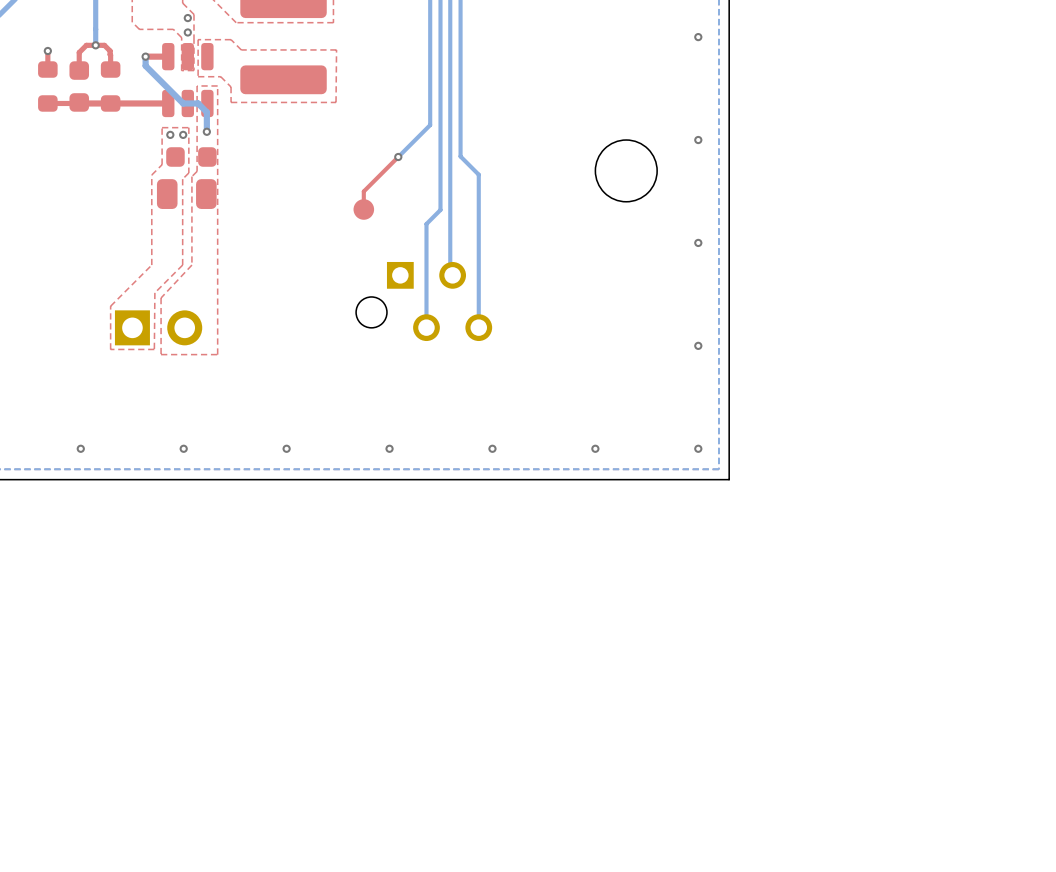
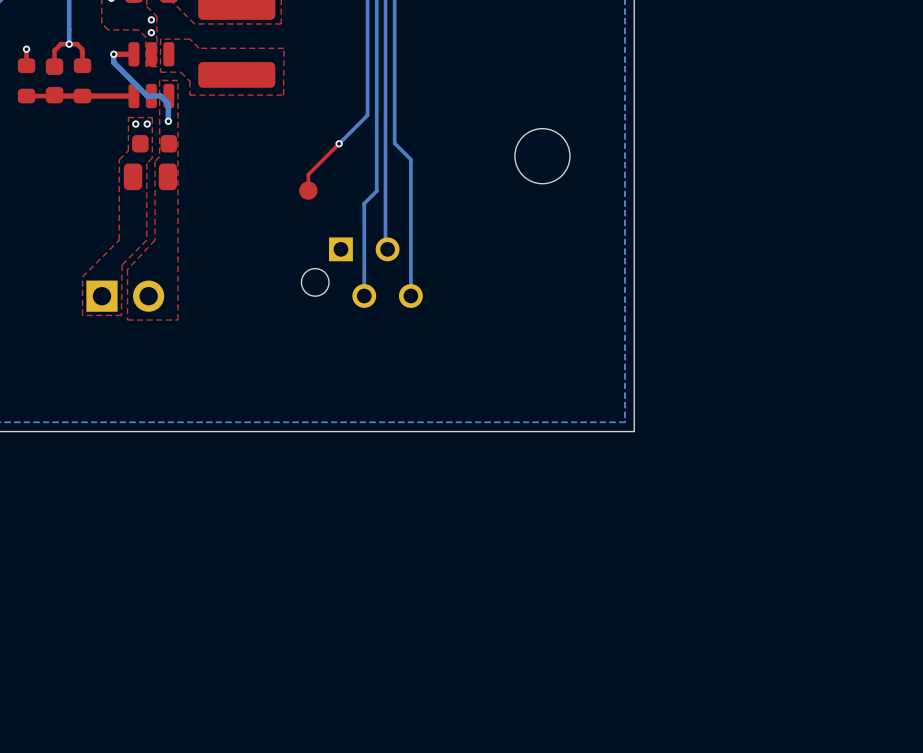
via: (698, 37) -> none
via: (698, 140) -> none
via: (698, 242) -> none
via: (698, 345) -> none
via: (80, 448) -> none
via: (183, 448) -> none
via: (286, 448) -> none
via: (389, 448) -> none
via: (492, 448) -> none
via: (595, 448) -> none
via: (698, 448) -> none

